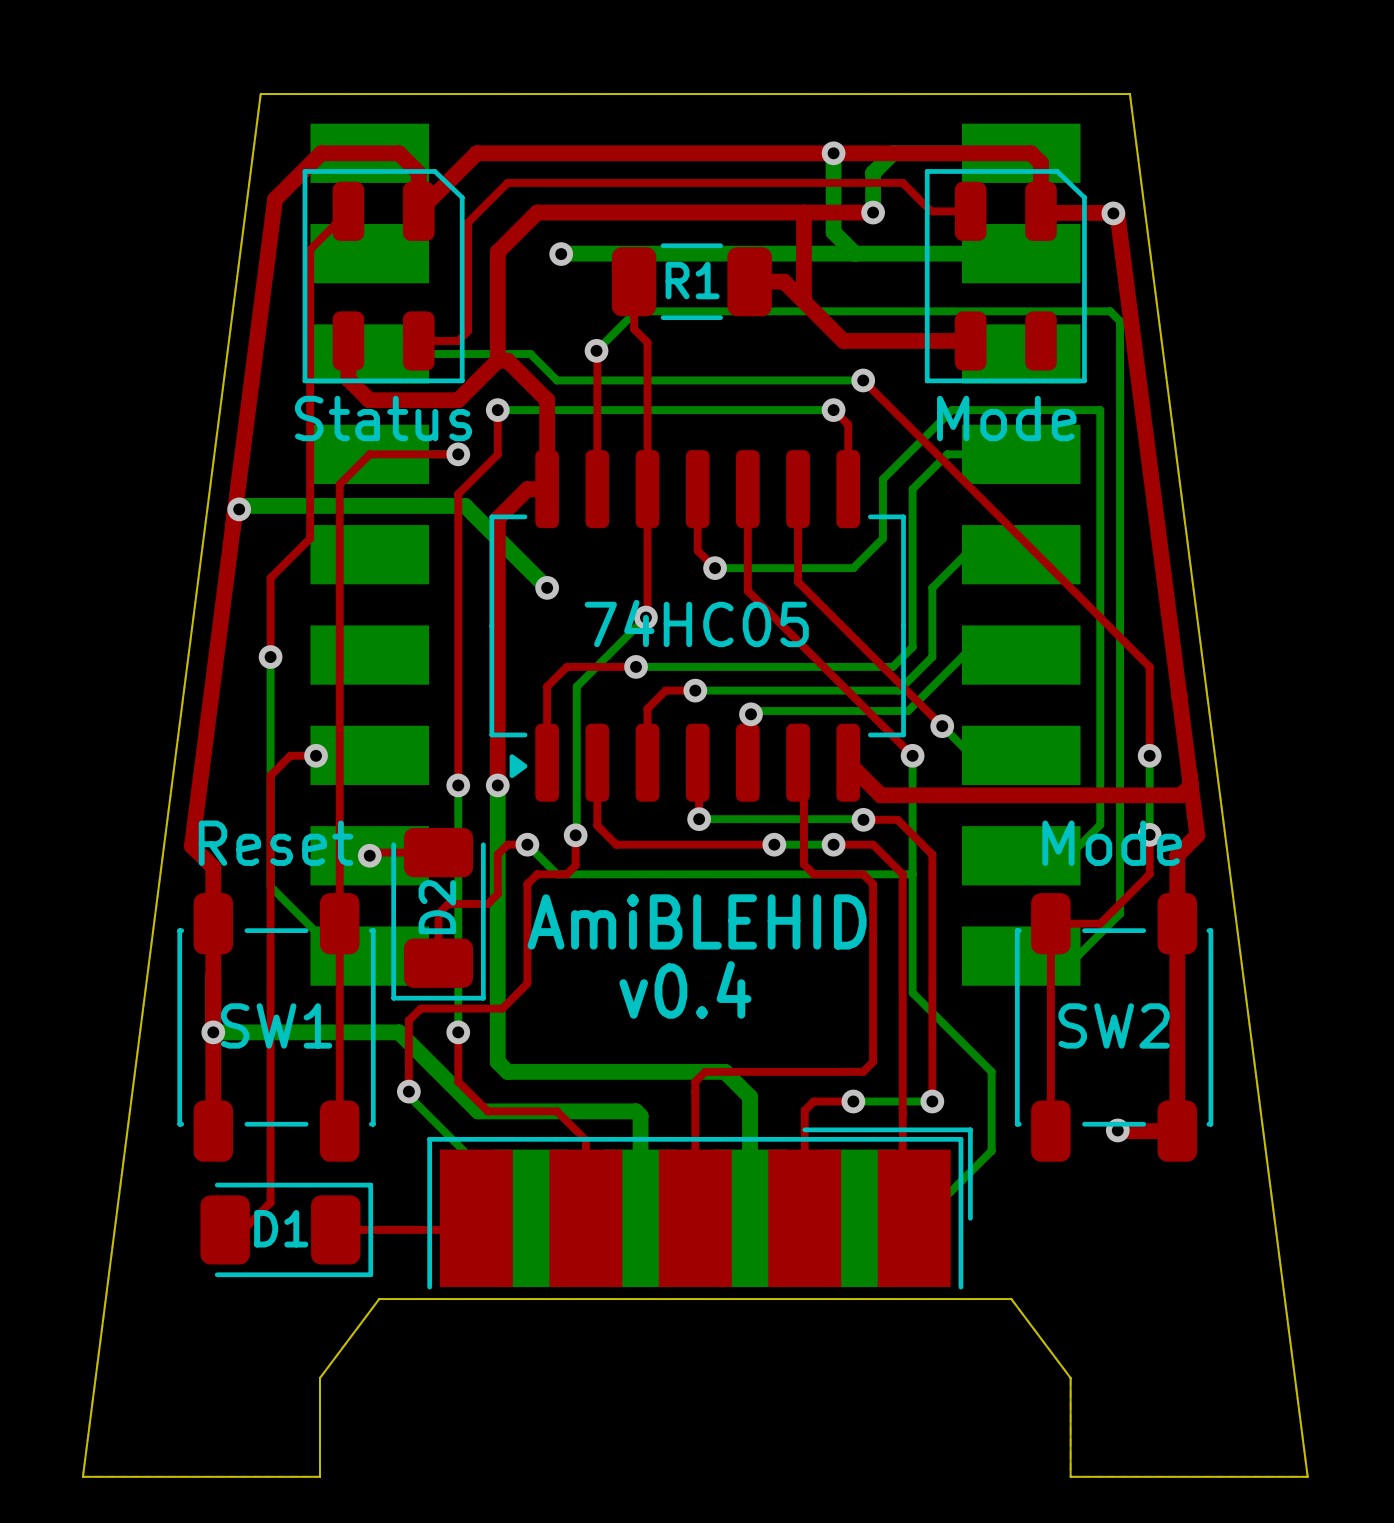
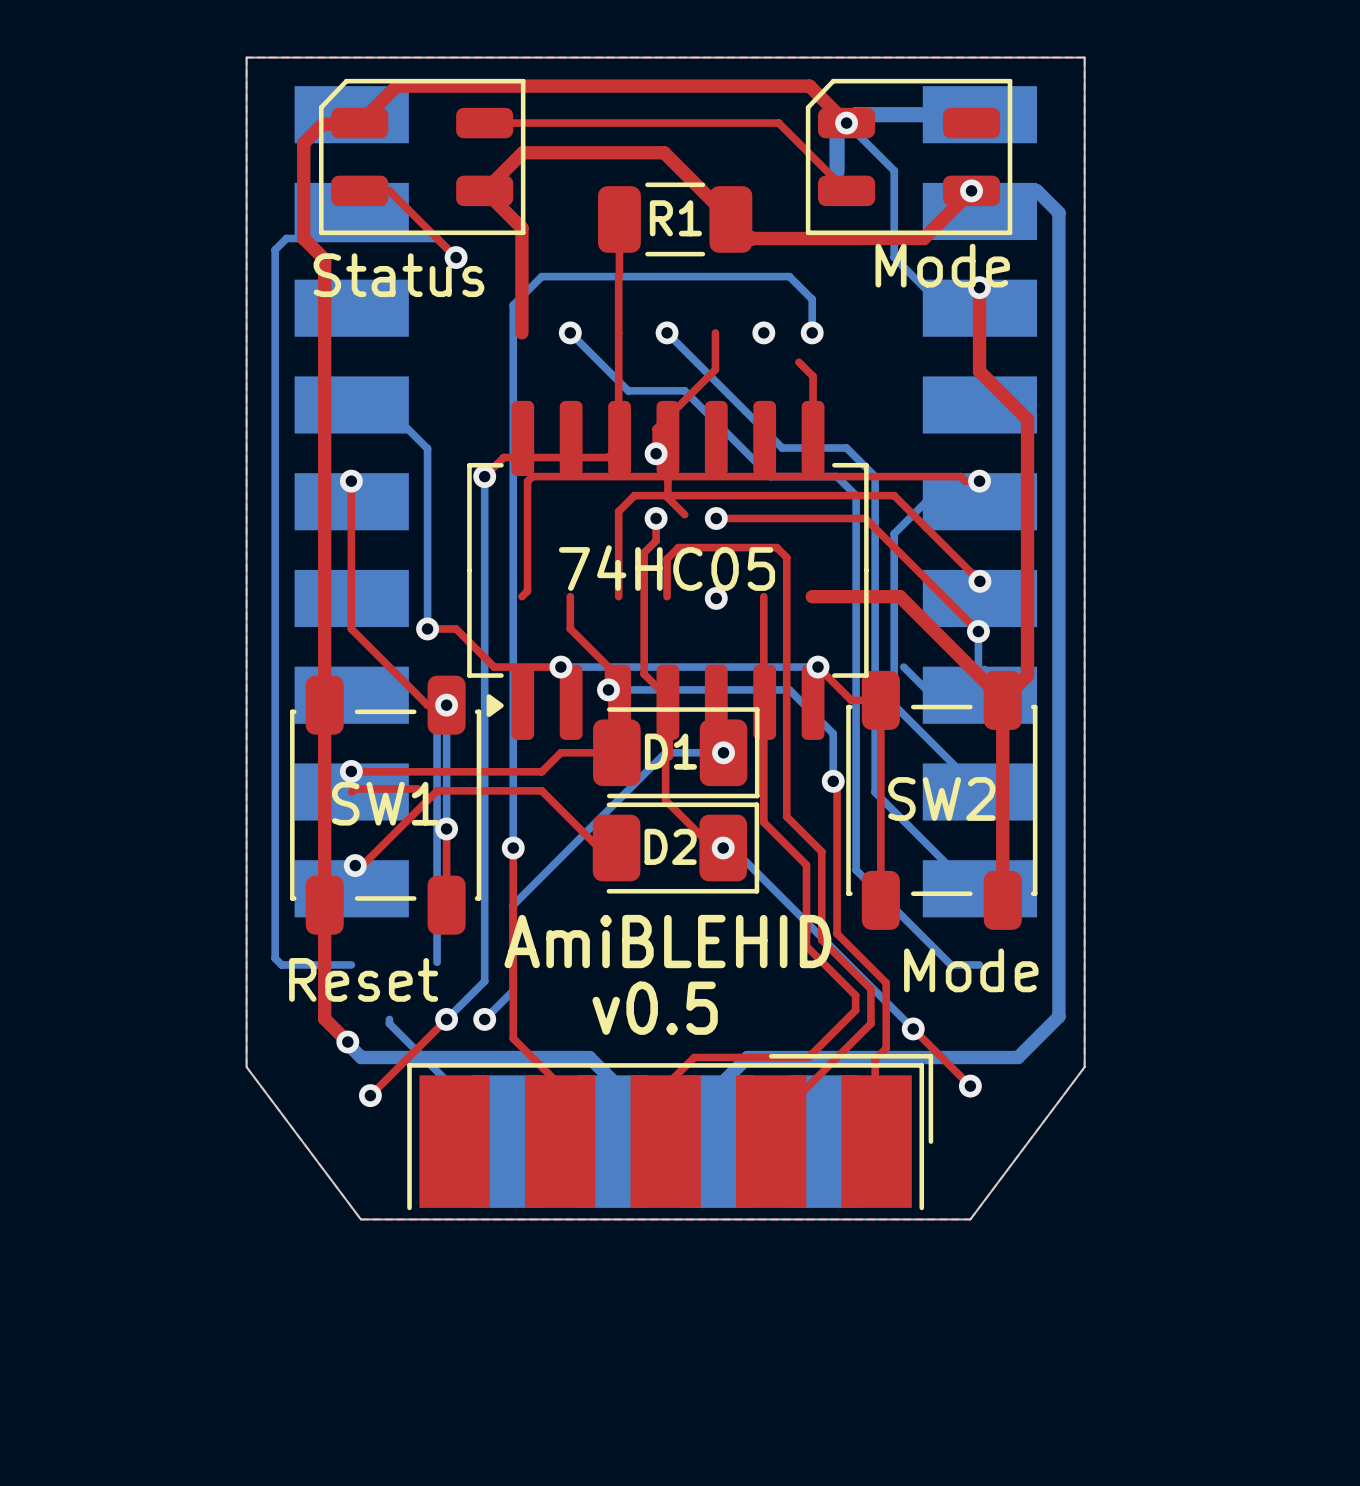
board edge: (260, 94) (82, 1476) (319, 1476) (319, 1378) (379, 1299) -> (246, 57) (246, 1067) (360, 1219)
board edge: (1129, 94) (1307, 1476) (1070, 1476) (1070, 1378) (1011, 1299) -> (1084, 57) (1084, 1067) (970, 1219)
bottom track: (833, 153) (833, 232) (854, 253) -> none
via: (833, 153) -> none
top track: none -> (484, 123) (778, 123) (846, 190)
top track: none -> (846, 123) (809, 86) (396, 86) (358, 124) (322, 124) (303, 143) (303, 238) (324, 259) (324, 1018) (347, 1042)
bottom track: none -> (846, 123) (894, 170) (894, 257) (924, 287) (991, 287)
via: none -> (846, 123)
top track: (348, 211) (310, 249) (310, 538) (270, 578) (270, 657) -> none
top track: (970, 211) (931, 211) (902, 182) (507, 182) (468, 222) (468, 331) (458, 340) (418, 340) -> none
top track: (803, 212) (803, 301) -> none
top track: (873, 212) (537, 212) (497, 252) (497, 360) -> none
via: (873, 212) -> none
via: (1113, 213) -> none
top track: none -> (334, 190) (389, 190) (456, 257)
bottom track: none -> (932, 190) (1037, 190) (1058, 212) (1058, 1016) (1018, 1057) (747, 1057) (722, 1082) (722, 1151)
top track: none -> (971, 190) (923, 238) (749, 238) (664, 152) (522, 152) (484, 190) (521, 228) (521, 332)
via: none -> (971, 190)
bottom track: (561, 253) (1021, 253) -> none
via: (561, 254) -> none
top track: none -> (619, 219) (618, 447) (608, 457) (503, 457) (484, 476)
part rotation: 0° (383, 276) -> 90° counterclockwise (422, 156)
part rotation: 0° (1005, 276) -> 90° counterclockwise (909, 156)
top track: (634, 281) (634, 329) (647, 342) (647, 615) (645, 617) -> none
R1 position: (691, 281) -> (675, 219)
top track: (784, 281) (843, 340) (970, 340) -> none
bottom track: none -> (456, 257) (437, 238) (286, 238) (275, 249) (275, 958) (281, 964) (351, 964)
via: none -> (456, 257)
top track: none -> (979, 287) (979, 371) (1027, 419) (1027, 675) (1002, 700)
via: none -> (979, 287)
top track: (348, 340) (348, 379) (369, 400) (458, 400) (497, 360) -> none
top track: (596, 350) (597, 489) -> none
bottom track: (596, 350) (636, 311) (1110, 311) (1120, 321) (1120, 913) (1077, 956) (1021, 956) -> none
via position: (596, 350) -> (570, 332)
bottom track: (369, 354) (530, 354) (557, 380) (863, 380) -> none
top track: (497, 360) (507, 360) (547, 400) (547, 489) (527, 489) (497, 518) (497, 785) -> none
bottom track: none -> (570, 332) (628, 390) (684, 390) (770, 476) (837, 476) (856, 495) (856, 870) (950, 964) (979, 964)
via: none -> (667, 332)
top track: none -> (715, 332) (715, 369) (656, 428) (656, 453)
via: none -> (763, 332)
bottom track: none -> (812, 332) (812, 299) (789, 276) (541, 276) (513, 305) (513, 848)
top track: (863, 380) (1149, 666) (1149, 755) -> none
via position: (863, 380) -> (812, 332)
top track: (497, 410) (497, 454) (458, 494) (458, 785) -> none
bottom track: (497, 410) (833, 410) -> none
via: (497, 410) -> none
via: (833, 410) -> none
bottom track: none -> (351, 384) (363, 384) (427, 448) (427, 628)
top track: (458, 454) (369, 454) (339, 484) (339, 1131) -> none
via: (458, 454) -> none
bottom track: (1021, 454) (947, 454) (912, 489) (912, 528) -> (667, 332) (782, 448) (846, 448) (875, 476)
top track: (747, 489) (747, 591) (912, 755) -> none
top track: (803, 495) (798, 489) (798, 581) (942, 726) -> none
via: none -> (656, 453)
bottom track: (239, 509) (242, 505) (465, 505) (547, 587) -> none
via: (239, 509) -> none
bottom track: none -> (484, 476) (484, 981) (446, 1019)
via: none -> (484, 476)
top track: none -> (351, 481) (351, 628) (427, 705) (446, 705)
via: none -> (351, 481)
top track: none -> (979, 481) (965, 481) (960, 476) (532, 476) (527, 481) (527, 591) (521, 596)
via: none -> (979, 481)
bottom track: (715, 568) (853, 568) (882, 538) (882, 479) (952, 410) (1100, 410) (1100, 824) (1069, 855) (1021, 855) -> none
via: (715, 568) -> none
top track: none -> (656, 518) (656, 540) (644, 552) (644, 674) (665, 695) (665, 800) (713, 848) (723, 848)
via: none -> (656, 518)
top track: none -> (716, 518) (865, 518) (978, 631) (978, 636)
via: none -> (716, 518)
via: (547, 587) -> none
bottom track: (645, 617) (576, 686) (575, 835) -> none
via: (645, 617) -> none
top track: none -> (979, 581) (894, 495) (634, 495) (618, 511) (618, 596)
via: none -> (979, 581)
bottom track: (912, 647) (892, 666) (636, 666) -> (875, 590) (875, 695)
top track: none -> (570, 596) (570, 628) (608, 667) (608, 689)
top track: none -> (667, 596) (667, 559) (678, 547) (776, 547) (786, 557) (786, 816) (821, 851) (821, 940) (870, 989) (870, 1023) (770, 1124) (770, 1152)
top track: none -> (763, 596) (763, 822) (806, 865) (806, 946) (855, 995) (855, 1010) (808, 1057) (694, 1057) (665, 1086)
top track: none -> (812, 596) (900, 596) (1002, 699) (1002, 900)
via: none -> (716, 598)
bottom track: (1021, 655) (964, 655) (908, 711) (754, 711) (751, 714) -> none
bottom track: (270, 657) (270, 886) (340, 956) (369, 956) -> none
via: (270, 657) -> none
bottom track: (932, 657) (898, 690) (695, 690) -> (894, 600) (894, 705) (960, 771) (979, 771)
top track: (636, 666) (566, 666) (547, 686) (547, 762) -> none
via: (636, 666) -> none
top track: none -> (427, 628) (456, 628) (494, 667) (560, 667)
via: none -> (427, 628)
bottom track: none -> (978, 631) (978, 673) (979, 674) (984, 669)
via: none -> (978, 631)
top track: (695, 690) (665, 690) (647, 708) (647, 762) -> none
via: (695, 690) -> none
via: (751, 714) -> none
bottom track: none -> (560, 667) (818, 667)
via: none -> (560, 667)
top track: none -> (818, 667) (851, 700) (880, 700) (880, 900)
via: none -> (818, 667)
via: (942, 726) -> none
bottom track: none -> (608, 689) (789, 689) (833, 733) (833, 781)
via: none -> (608, 689)
top track: (316, 755) (290, 755) (270, 775) (270, 1202) (243, 1229) -> none
via: (316, 755) -> none
via: (912, 755) -> none
bottom track: (1149, 755) (1149, 834) -> none
via: (1149, 755) -> none
top track: (848, 762) (880, 795) (1181, 795) (1190, 785) -> none
top track: (596, 763) (597, 825) (616, 844) (774, 844) -> none
bottom track: none -> (446, 705) (446, 828)
via position: (458, 785) -> (446, 705)
bottom track: (497, 785) (497, 1061) (507, 1071) (724, 1071) (750, 1096) (750, 1218) -> none
via: (497, 785) -> none
top track: (803, 785) (803, 864) (813, 874) (863, 874) (873, 884) -> (833, 781) (837, 785) (837, 819)
top track: none -> (616, 726) (616, 752) (560, 752) (541, 771) (351, 771)
bottom track: none -> (723, 752) (665, 752) (513, 905) (513, 990) (484, 1019)
via: none -> (723, 752)
bottom track: (699, 819) (863, 819) -> none
via: (699, 819) -> none
top track: (863, 819) (897, 819) (932, 854) (932, 1101) -> none
via: (863, 819) -> none
top track: (1149, 834) (1149, 874) (1100, 923) (1050, 923) (1050, 1131) -> none
via: (1149, 834) -> none
top track: (575, 835) (575, 865) (566, 874) (537, 874) (527, 884) (527, 983) (502, 1008) (420, 1008) (408, 1020) (408, 1091) -> none
via: (575, 835) -> none
SW1 value position: Reset (276, 843) -> Reset (363, 979)
SW2 value position: Mode (1112, 843) -> Mode (971, 970)
top track: (527, 844) (507, 844) (497, 854) (497, 894) (487, 903) (448, 903) (438, 913) (438, 963) -> none
bottom track: (527, 844) (557, 874) (912, 874) -> none
via: (527, 844) -> none
bottom track: (774, 844) (833, 844) -> none
via: (774, 844) -> none
top track: (833, 844) (873, 844) (902, 874) (902, 1206) (914, 1218) -> none
via: (833, 844) -> none
via: none -> (833, 781)
via position: (369, 855) -> (351, 771)
bottom track: (912, 856) (912, 992) (991, 1071) (991, 1150) (924, 1218) (859, 1218) -> (875, 792) (950, 868) (979, 868)
top track: none -> (446, 828) (446, 905)
via: none -> (446, 828)
top track: none -> (513, 848) (513, 1038) (560, 1086) (560, 1152)
via: none -> (513, 848)
top track: none -> (616, 848) (598, 848) (541, 790) (437, 790) (362, 865) (355, 865)
bottom track: none -> (723, 848) (732, 848) (913, 1028)
via: none -> (723, 848)
D2 rotation: 0° (438, 914) -> 90° counterclockwise (675, 848)
D2 position: (438, 914) -> (675, 848)
text position: AmiBLEHID (697, 921) -> AmiBLEHID (667, 941)
via: none -> (355, 865)
text: v0.4 (685, 989) -> v0.5 (655, 1008)
top track: (873, 1002) (873, 1061) (863, 1071) (705, 1071) (695, 1081) (695, 1160) -> (837, 933) (886, 982) (886, 1048) (875, 1059) (875, 1152)
SW1 position: (276, 1027) -> (385, 805)
SW2 position: (1114, 1027) -> (941, 800)
bottom track: (213, 1032) (399, 1032) (478, 1111) (636, 1111) (640, 1115) (640, 1218) -> none
via: (213, 1032) -> none
top track: (458, 1032) (458, 1081) (487, 1111) (557, 1111) (585, 1140) (585, 1218) -> none
via: (458, 1032) -> none
via: (408, 1091) -> none
top track: none -> (446, 1019) (370, 1095)
via: none -> (446, 1019)
via: none -> (484, 1019)
top track: (853, 1101) (813, 1101) (804, 1110) (804, 1218) -> none
bottom track: (853, 1101) (932, 1101) -> none
via: (853, 1101) -> none
via position: (932, 1101) -> (913, 1028)
top track: none -> (913, 1028) (970, 1086)
bottom track: none -> (347, 1042) (361, 1057) (589, 1057) (618, 1086) (618, 1152)
via: none -> (347, 1042)
top track: (215, 1128) (213, 1131) (213, 867) (191, 846) (275, 199) (321, 153) (399, 153) (418, 173) (418, 211) (476, 153) (1031, 153) (1041, 163) (1042, 212) (1117, 212) (1197, 835) (1177, 855) (1177, 1131) (1117, 1130) -> none
via: (1117, 1130) -> none
via: none -> (970, 1086)
via: none -> (370, 1095)
top track: (476, 1218) (464, 1229) (317, 1229) -> none
D1 position: (286, 1229) -> (676, 752)

